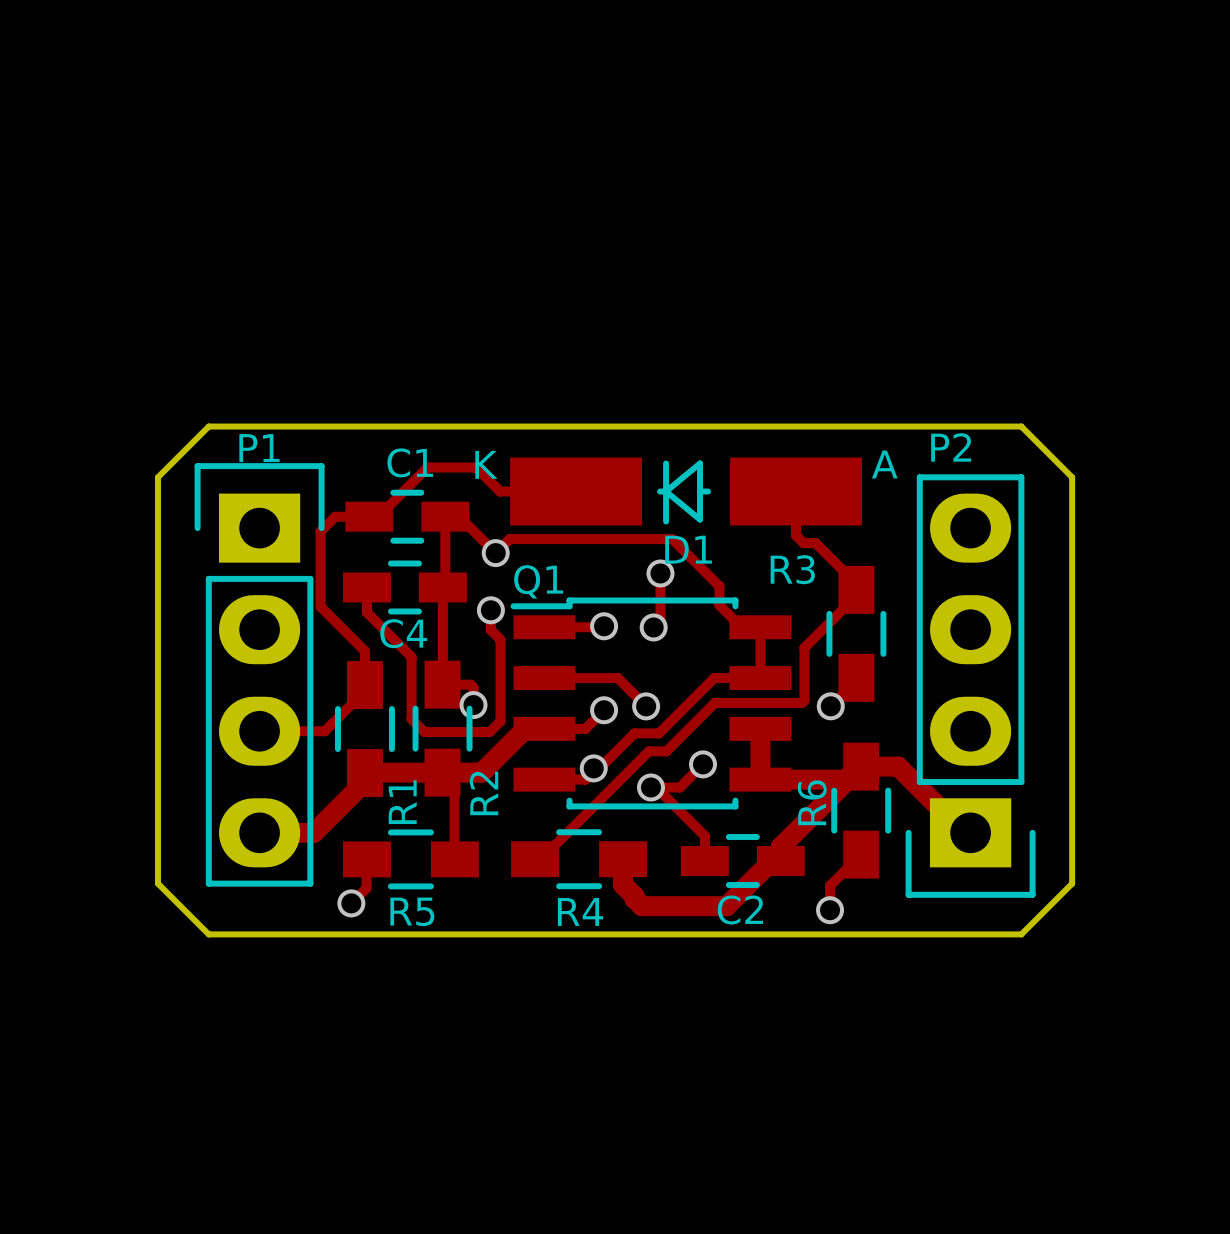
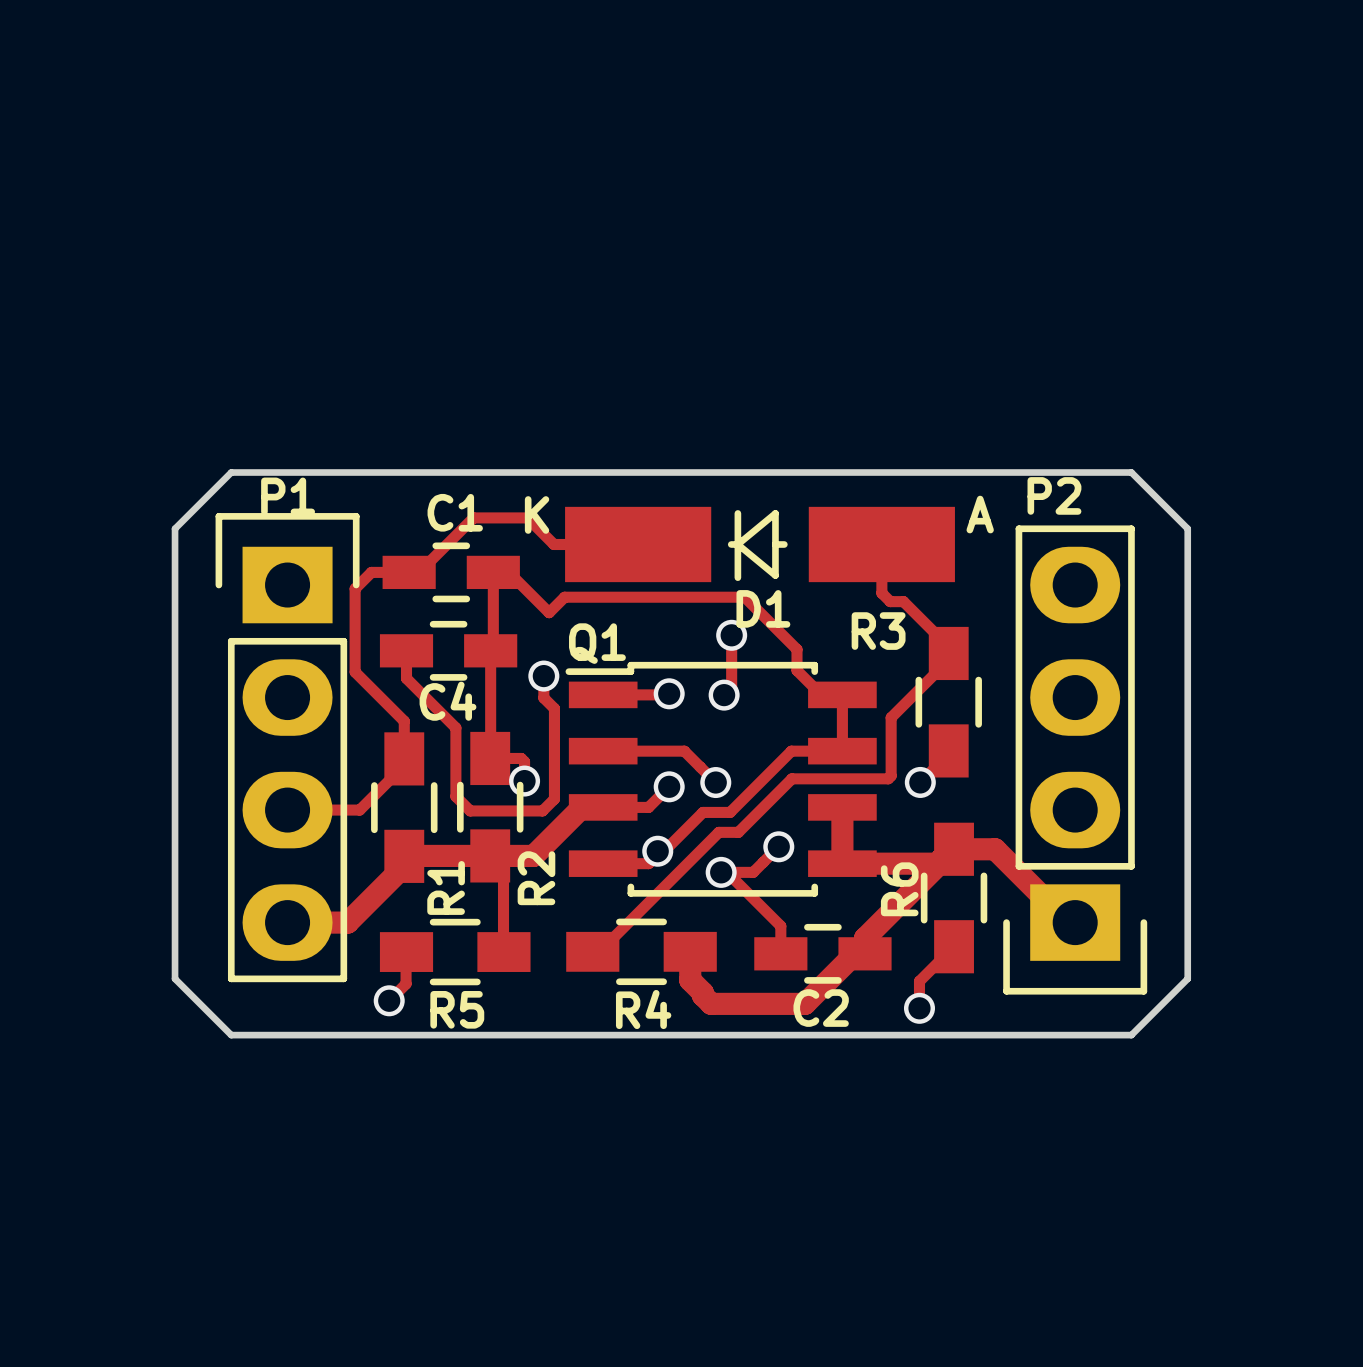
via: (495, 553) -> none

